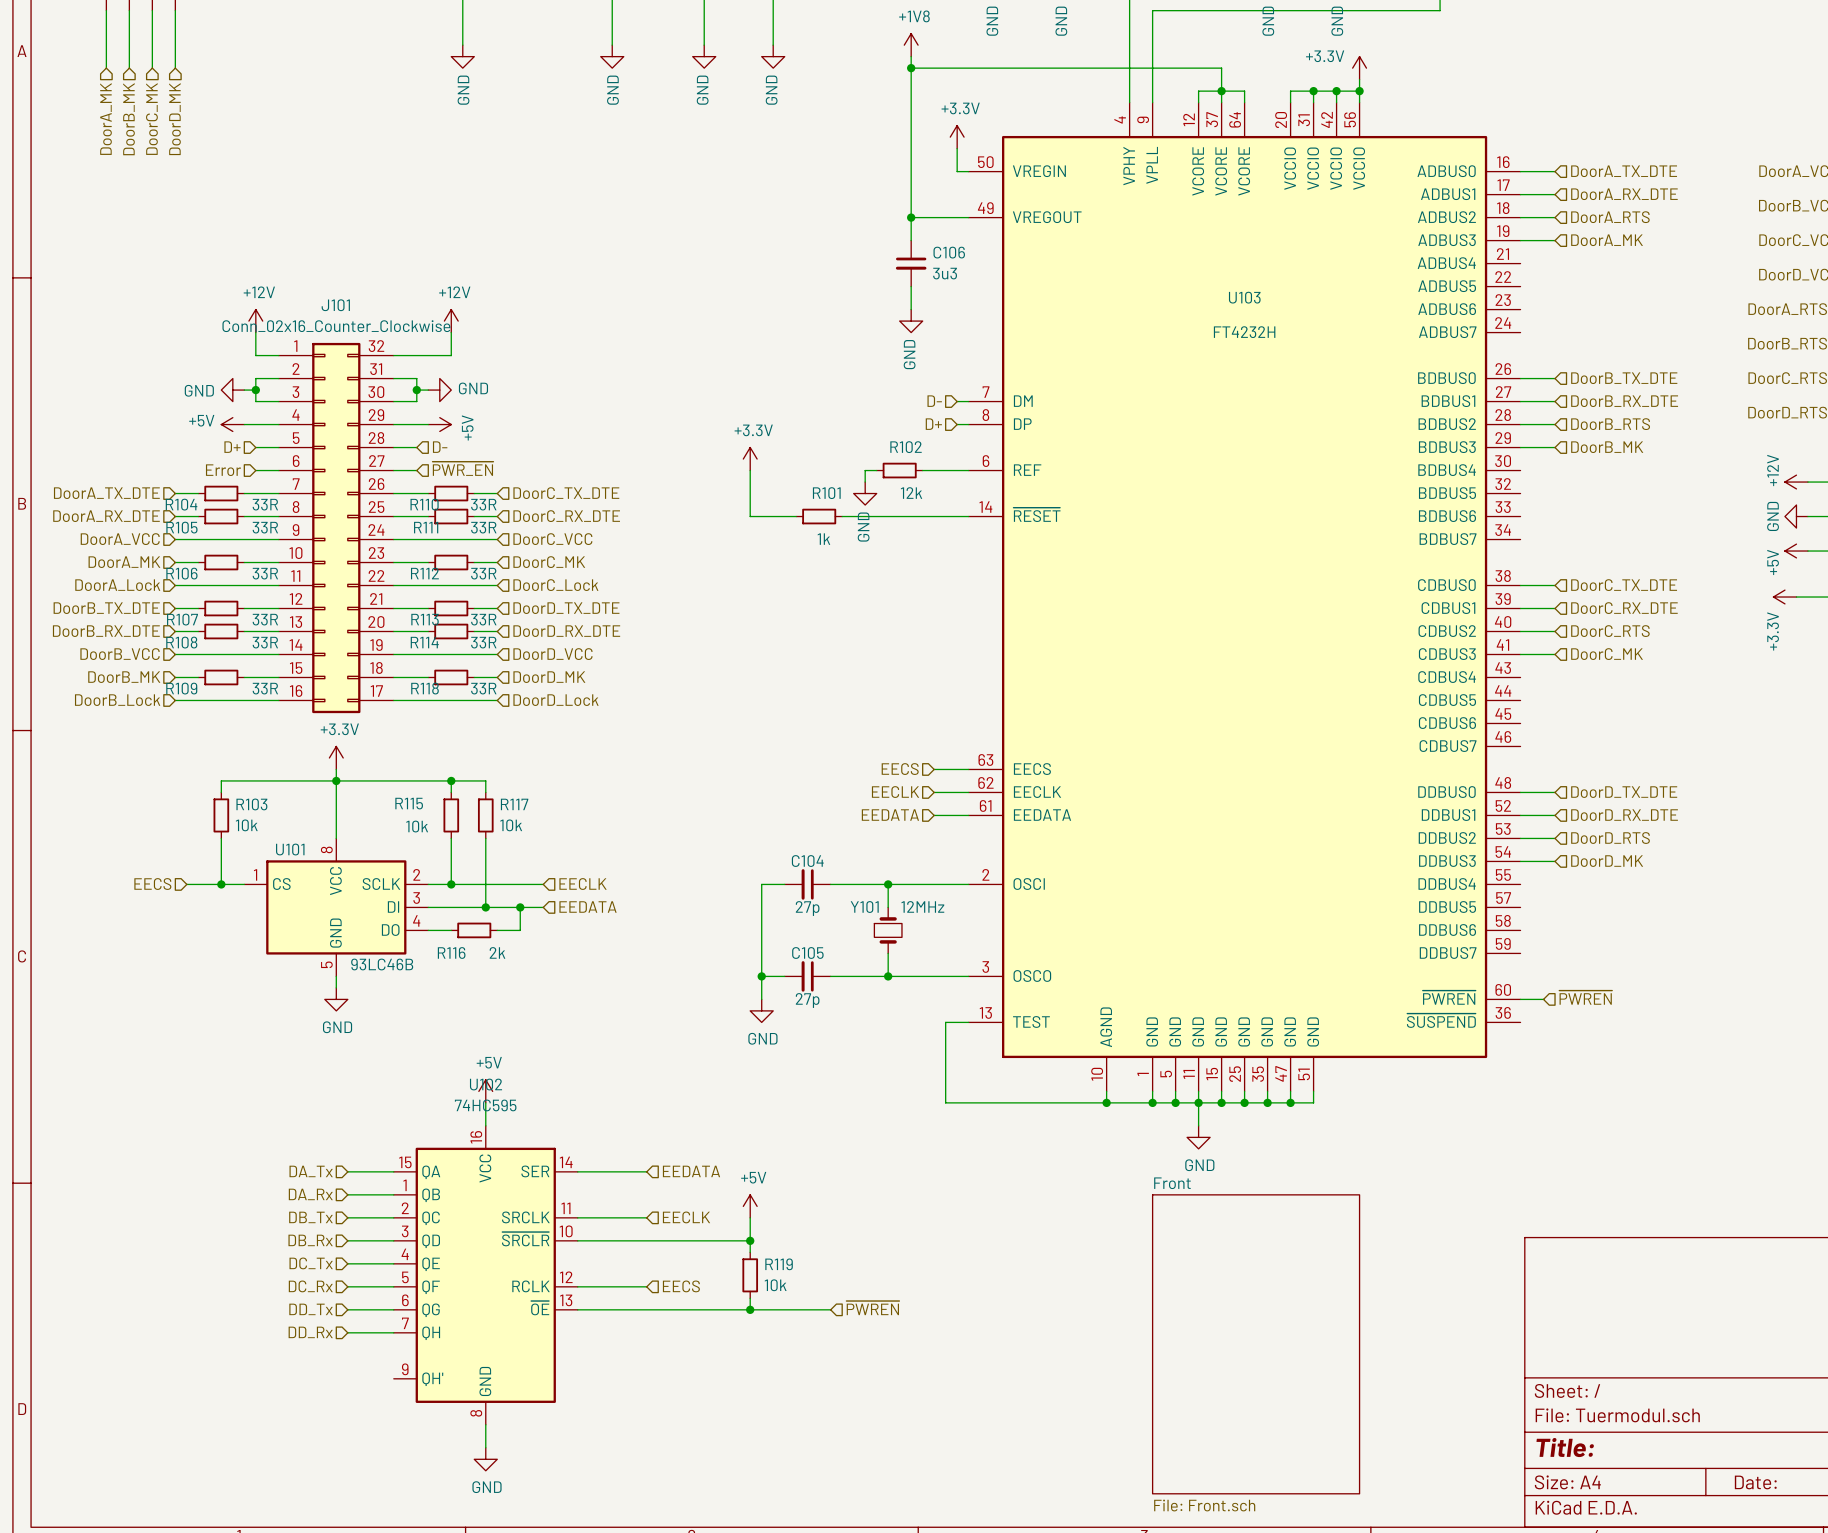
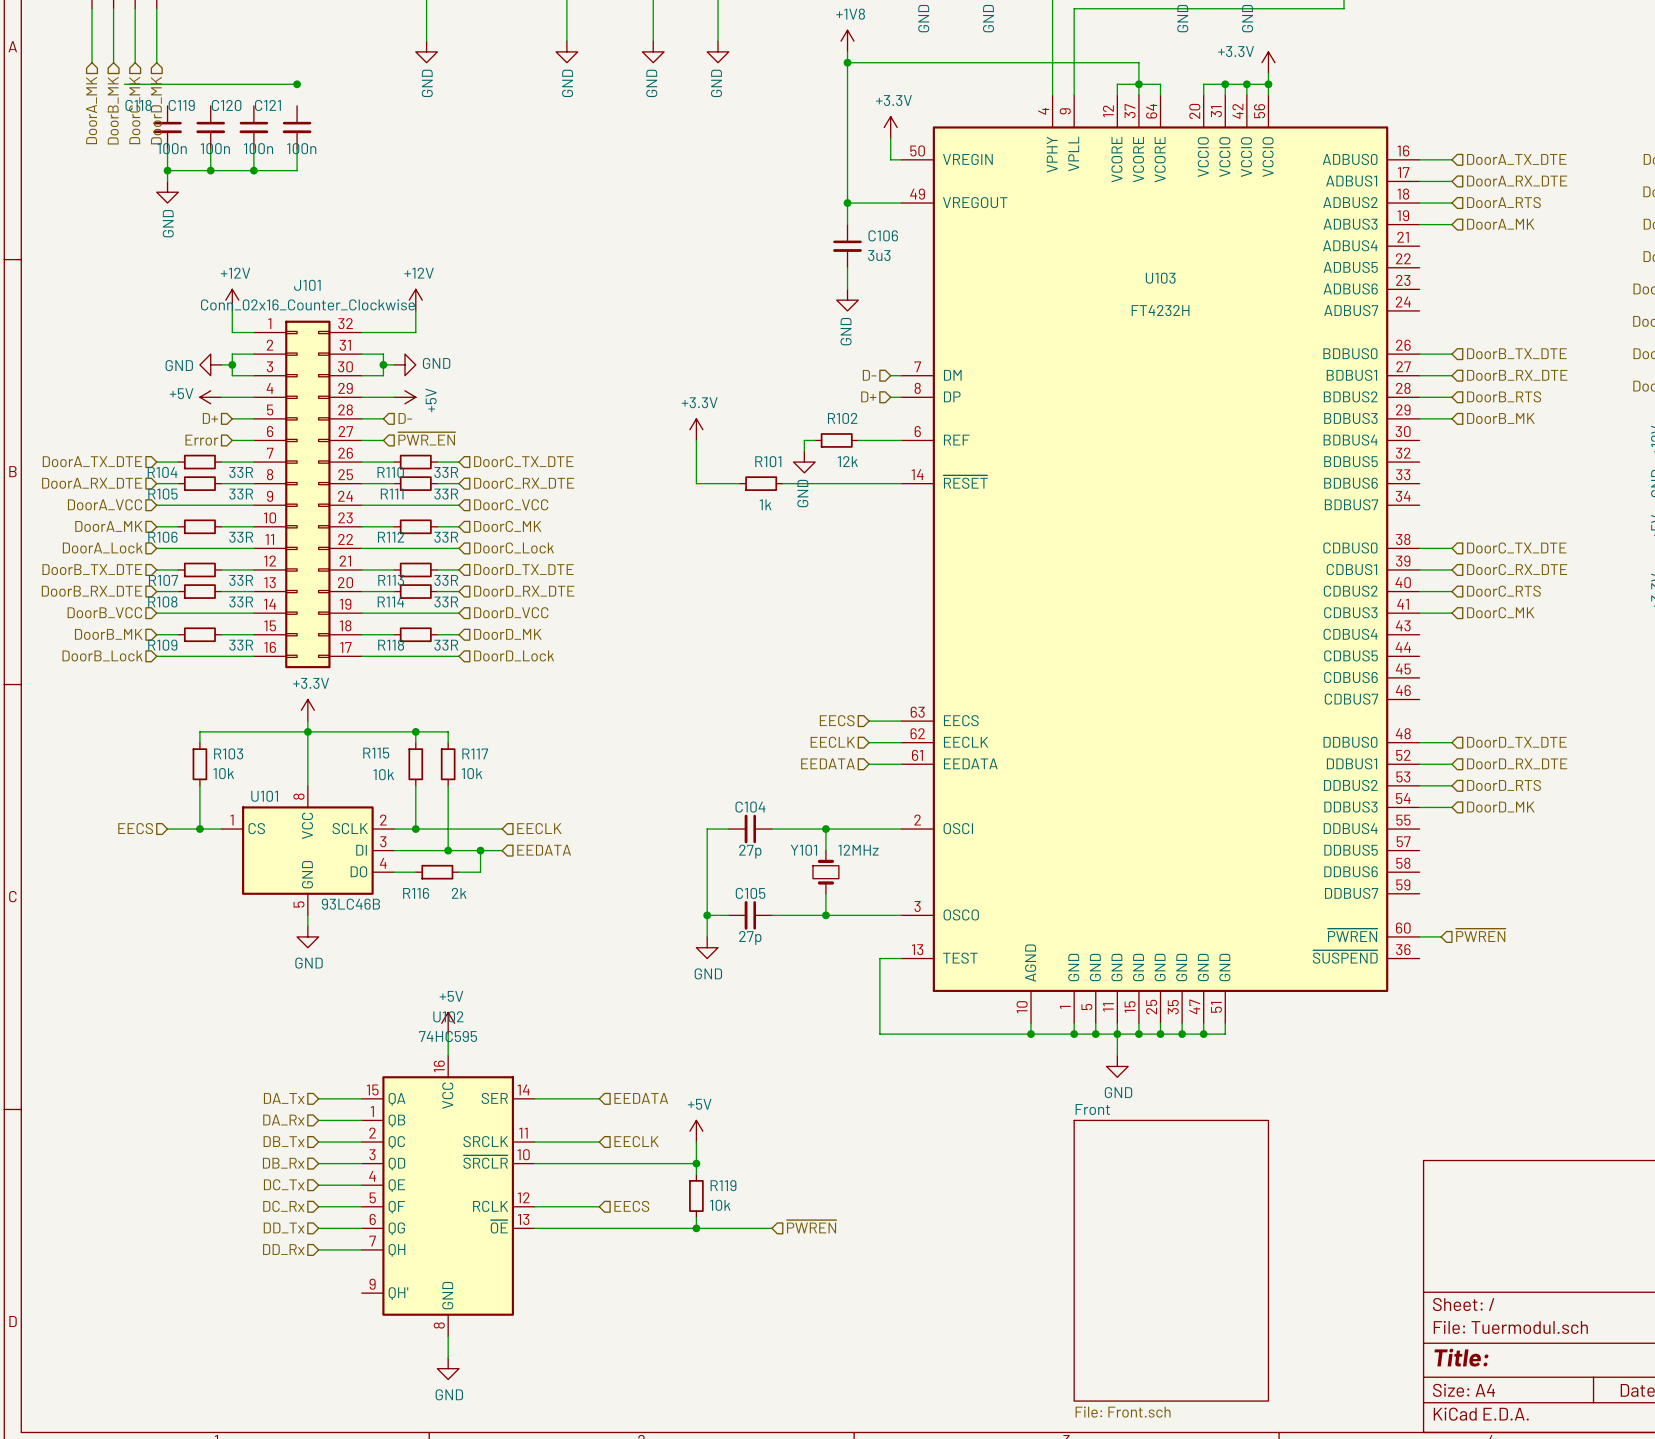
wire: none -> (124, 84) (297, 84)
junction: none -> (297, 84)
C118: none -> 100n (167, 127)
C119: none -> 100n (210, 127)
C120: none -> 100n (253, 127)
C121: none -> 100n (297, 127)
wire: none -> (167, 149) (167, 181)
wire: none -> (210, 149) (210, 170)
wire: none -> (253, 149) (253, 170)
wire: none -> (297, 149) (297, 170) (167, 170)
junction: none -> (167, 170)
junction: none -> (210, 170)
junction: none -> (253, 170)
power symbol: none -> GND (167, 192)

